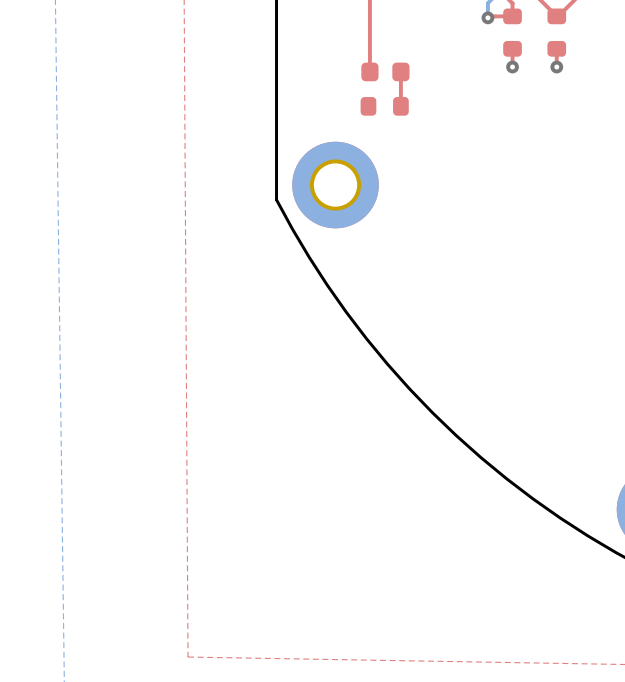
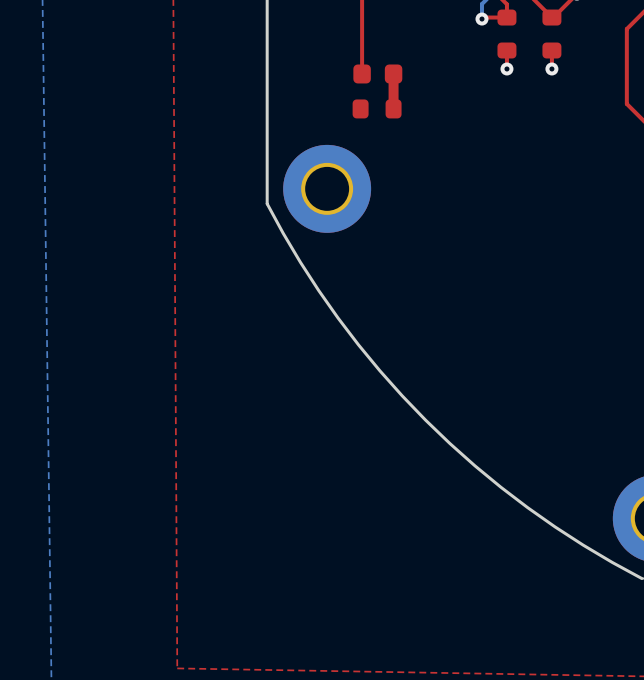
top track width: thin (400, 71) (400, 101) -> thick (393, 73) (393, 103)

